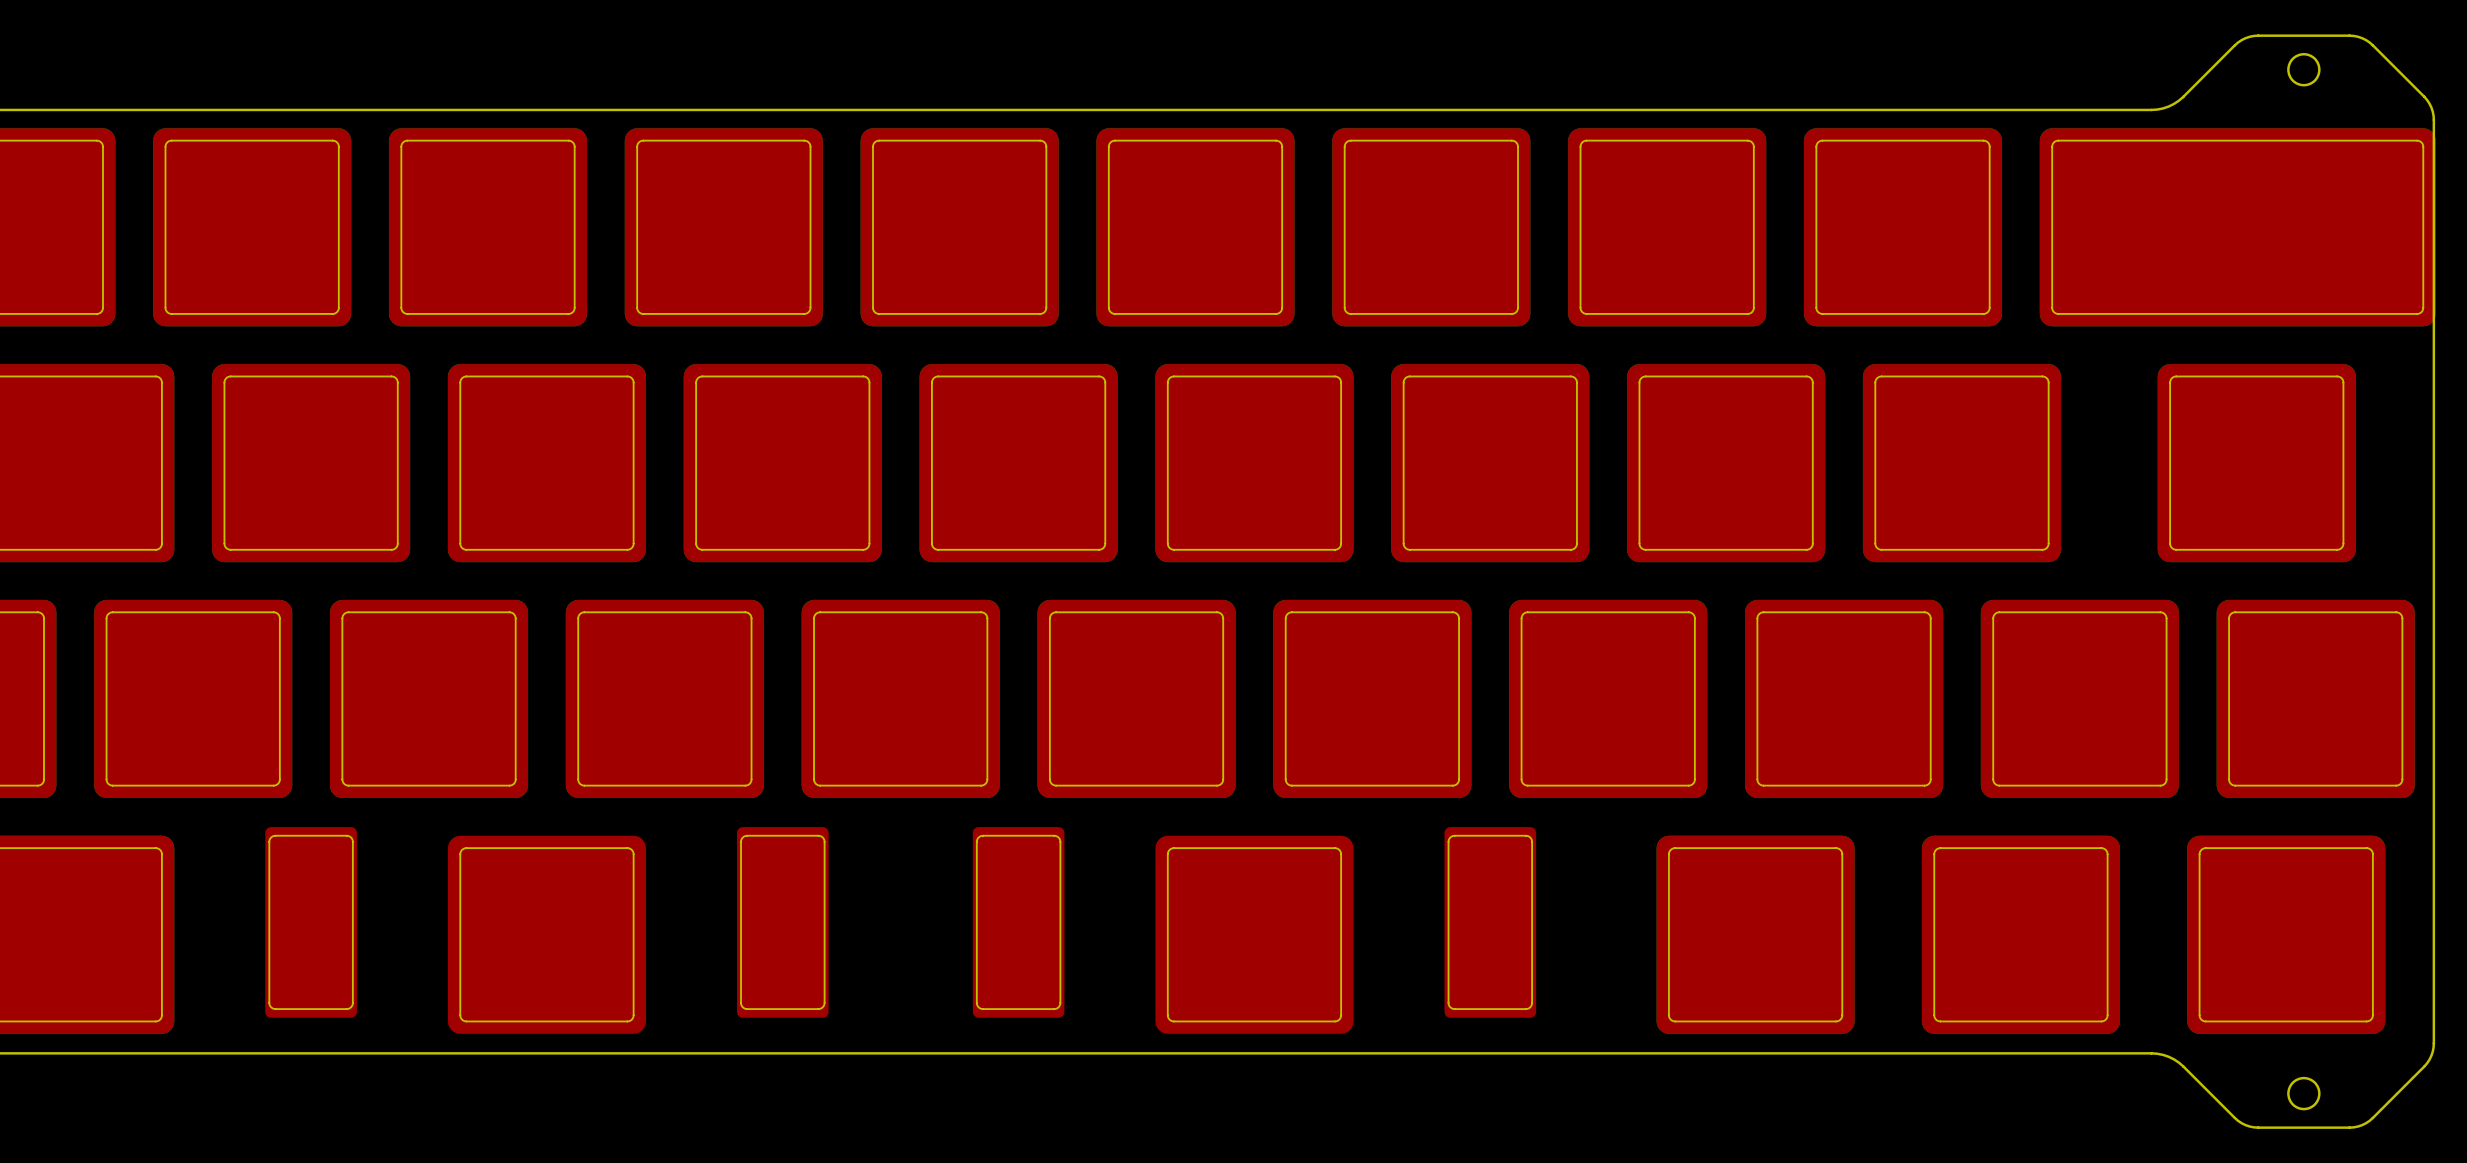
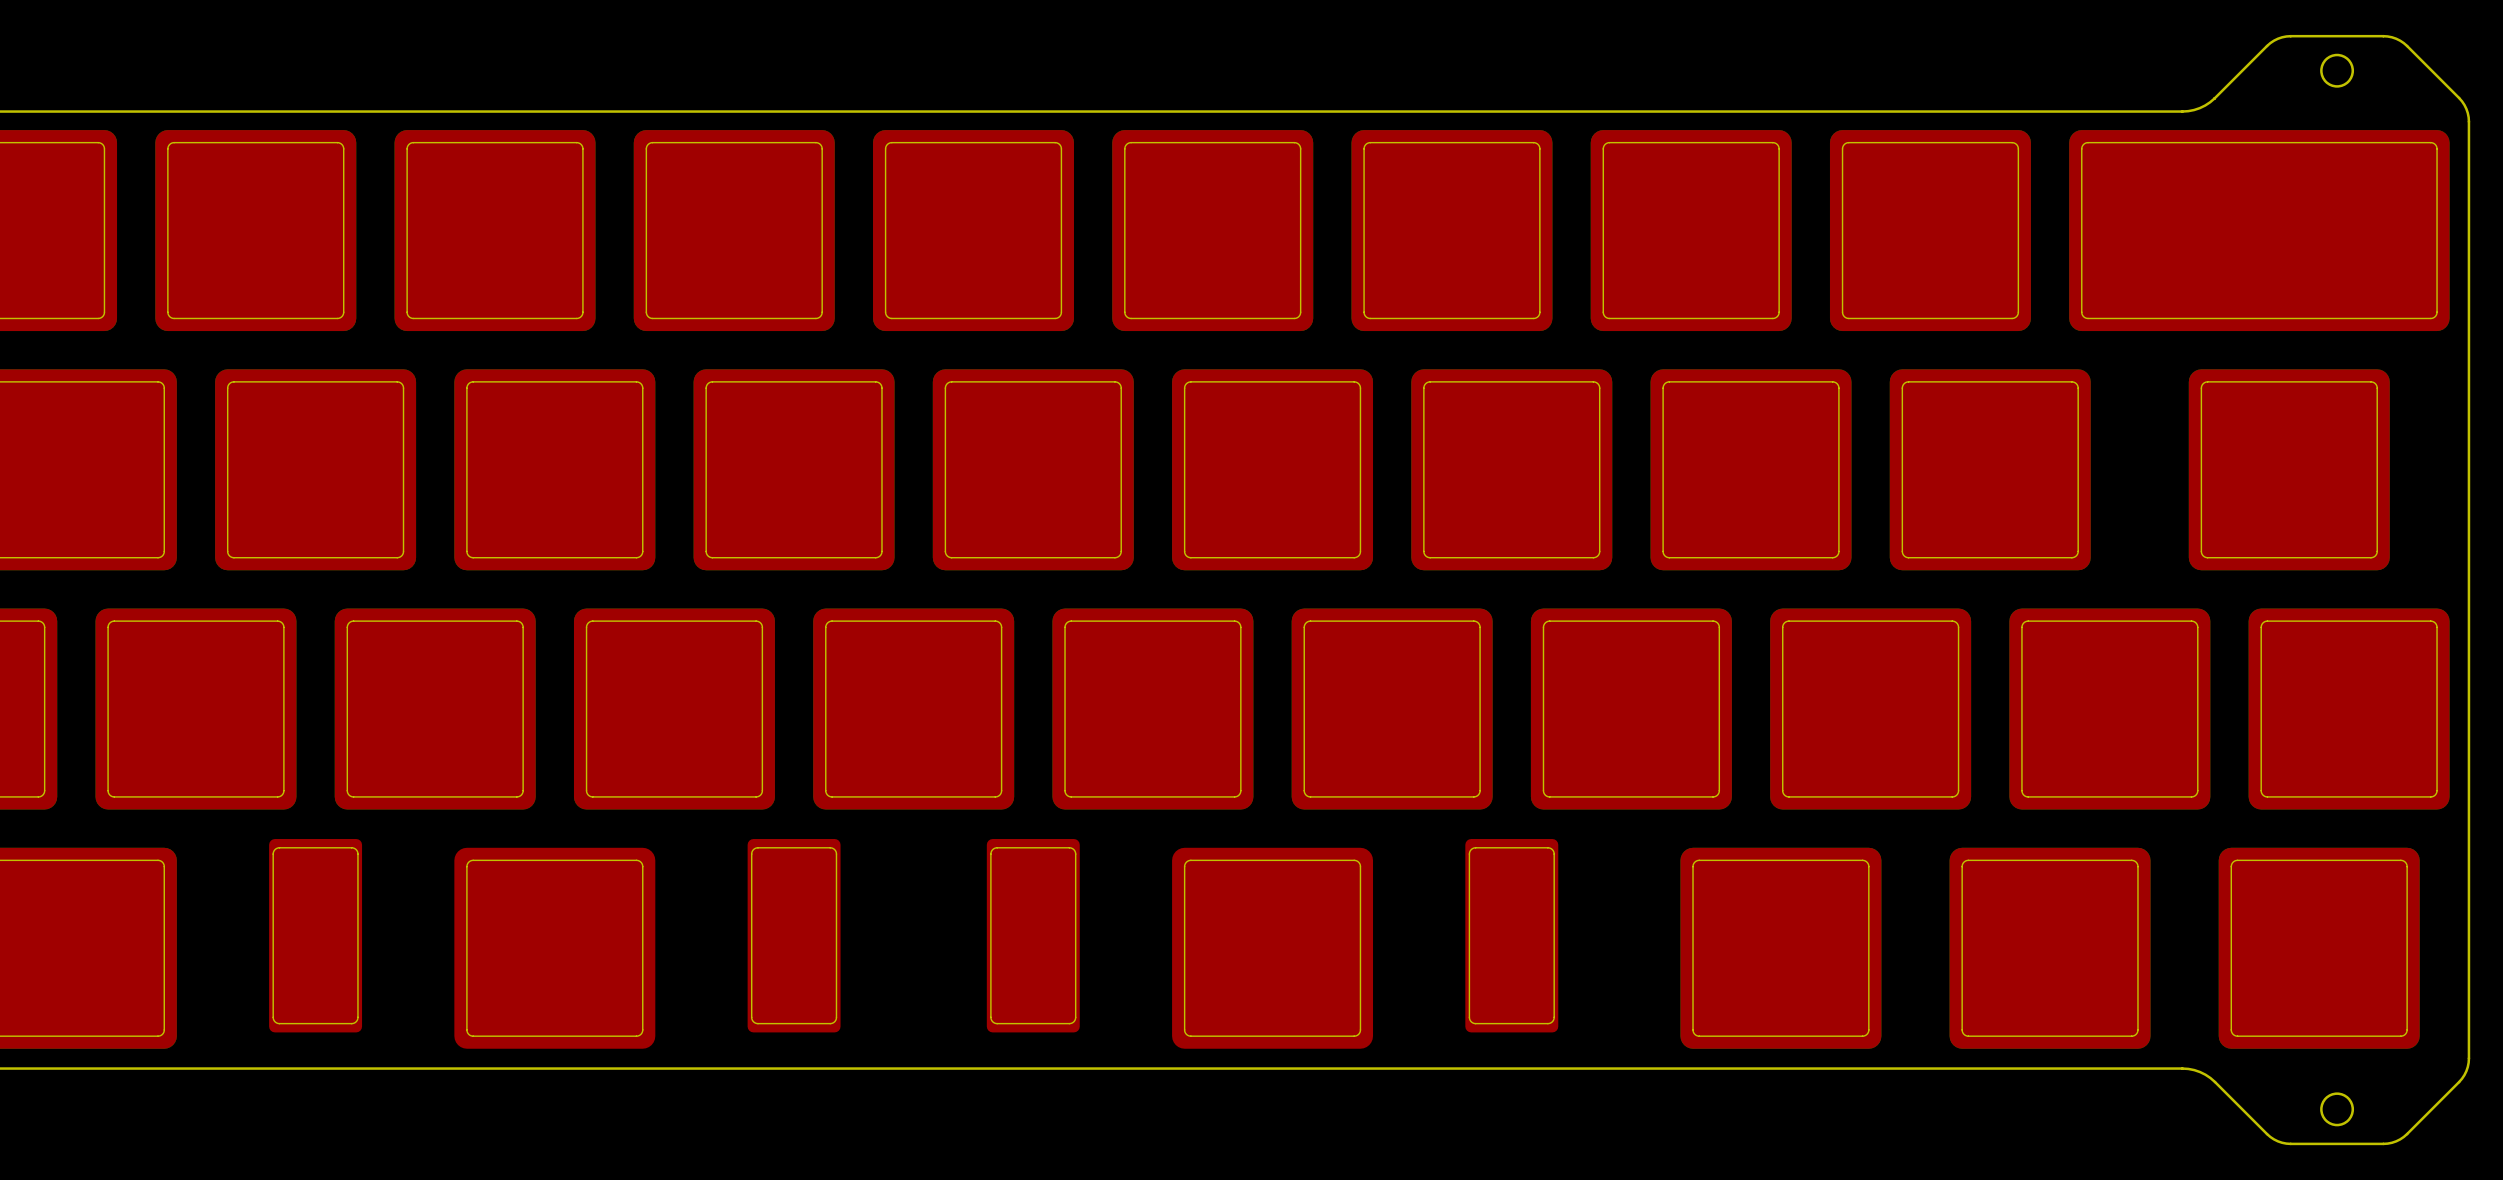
part footprint: [2039, 128, 2436, 327] -> [2069, 130, 2450, 332]

